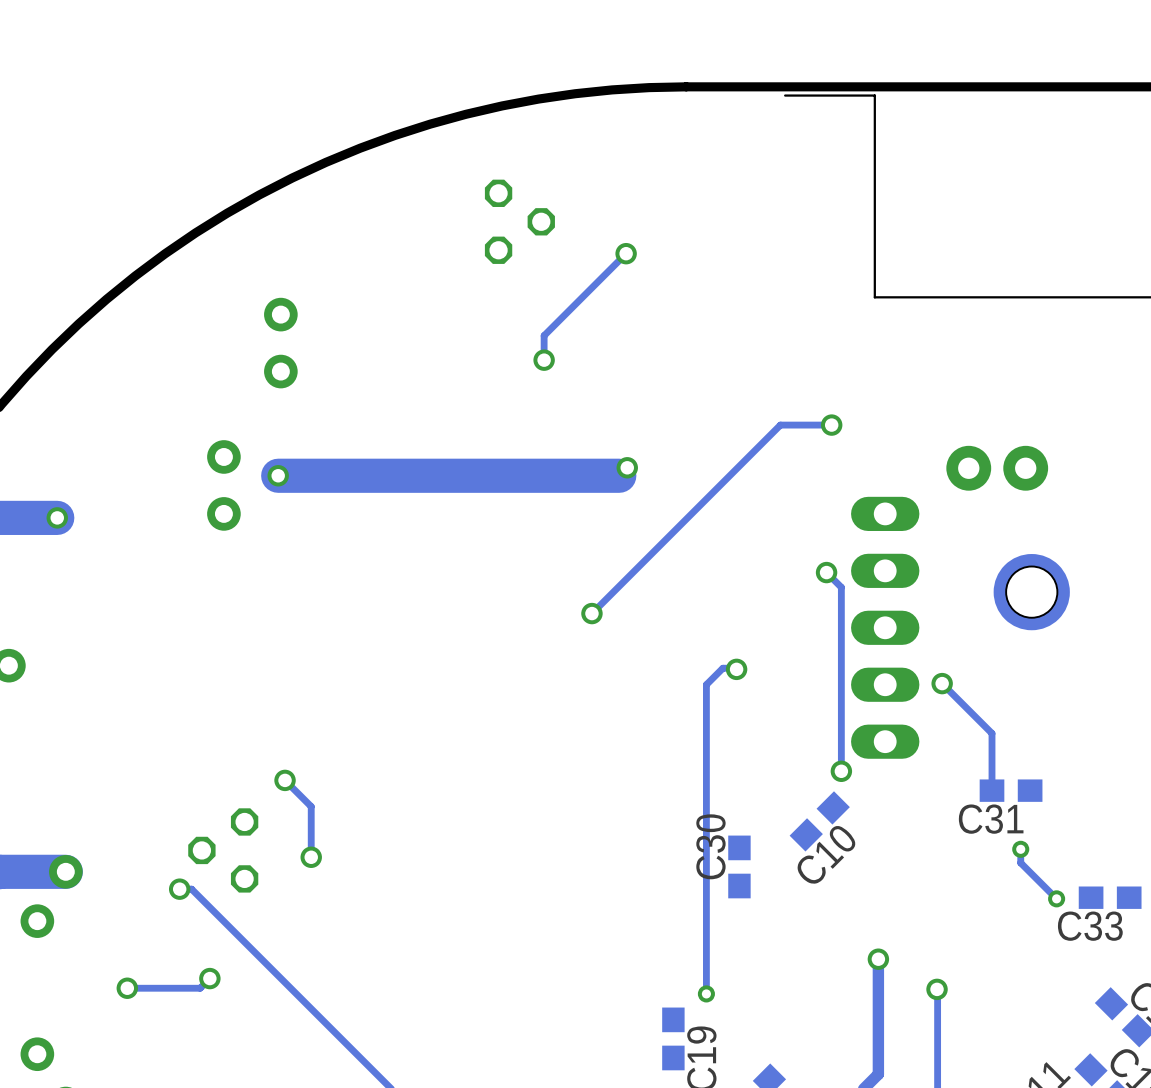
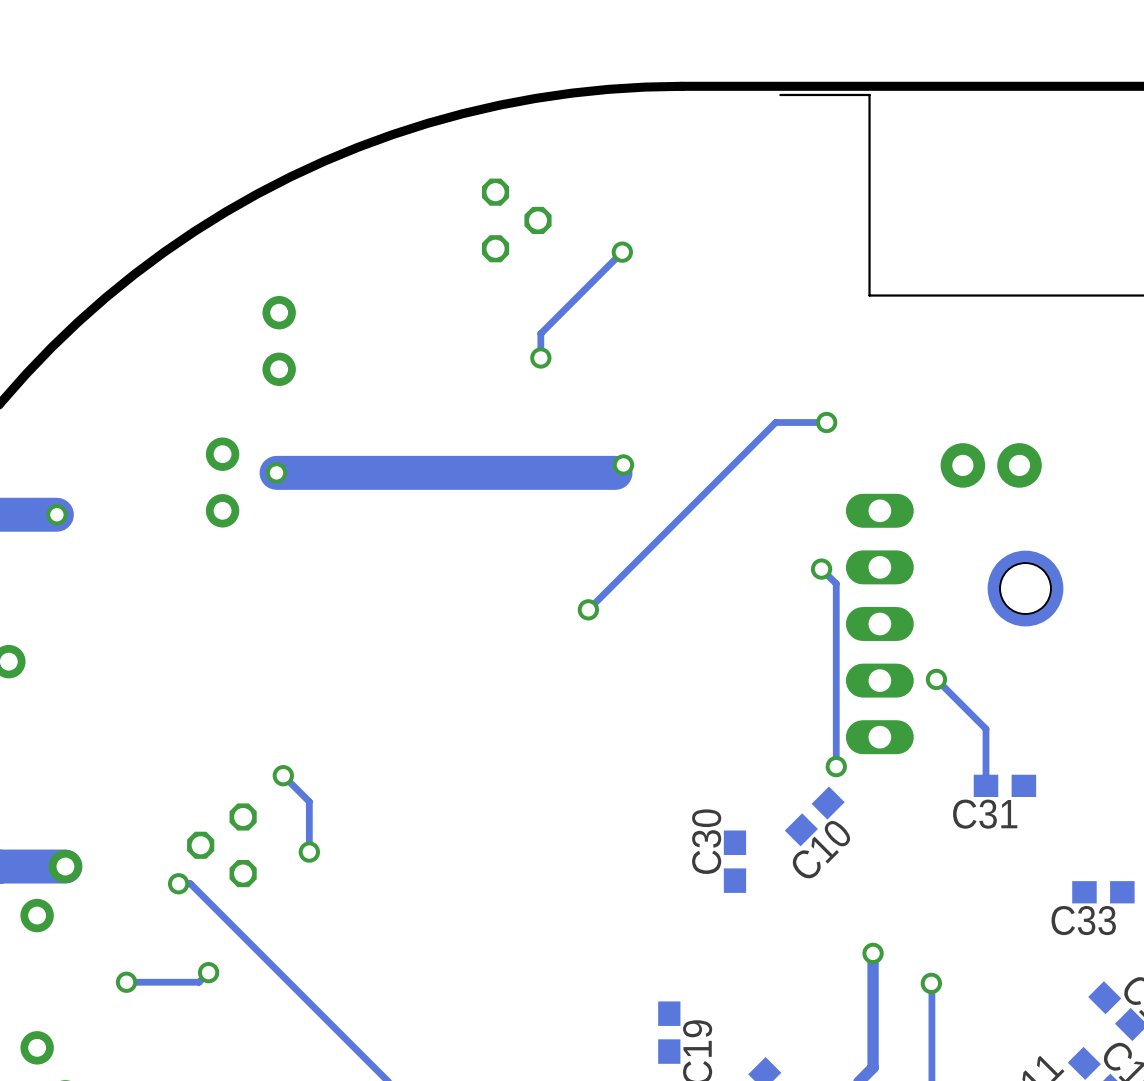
track: (736, 669) (722, 668) (706, 684) (706, 993) -> none
via: (736, 669) -> none
track: (1020, 849) (1020, 862) (1056, 898) -> none
via: (1020, 849) -> none
via: (1056, 898) -> none
via: (706, 993) -> none

